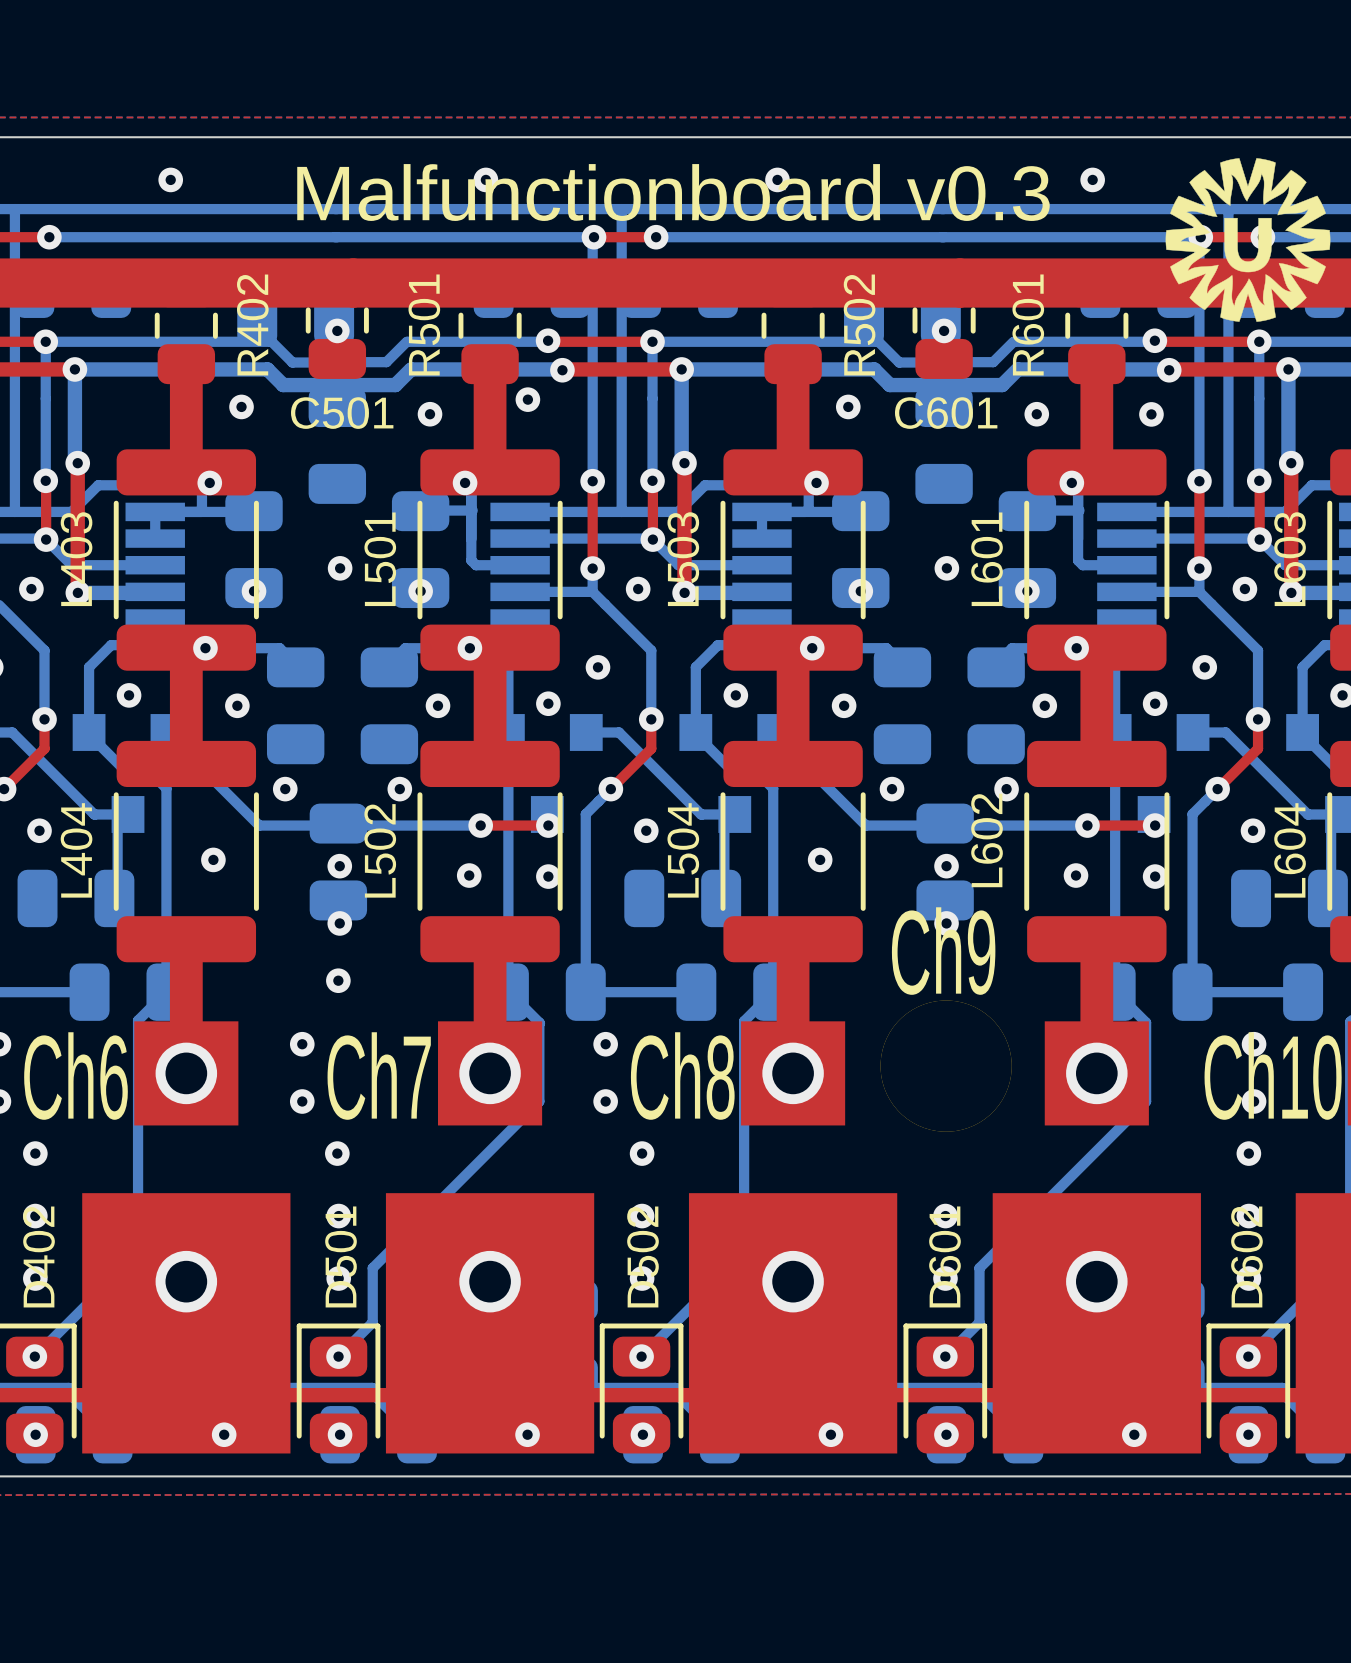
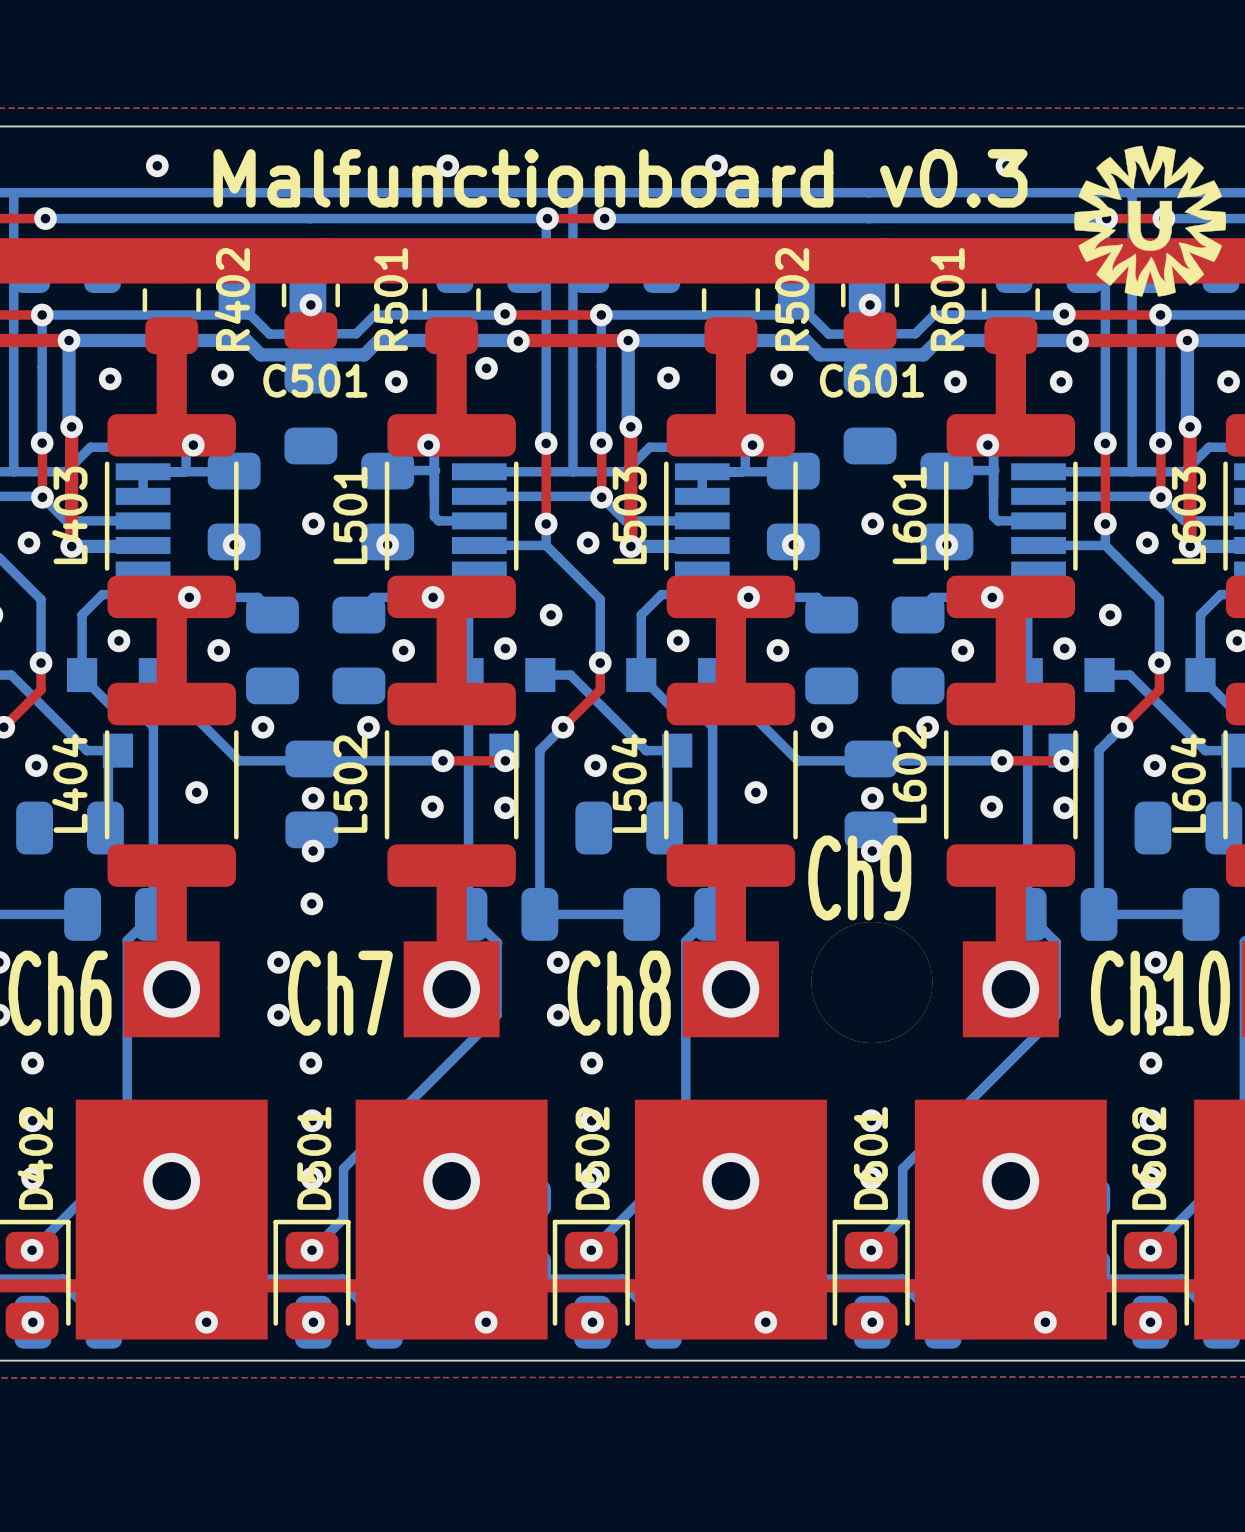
via: none -> (668, 378)
via: none -> (110, 378)
via: none -> (1228, 381)

